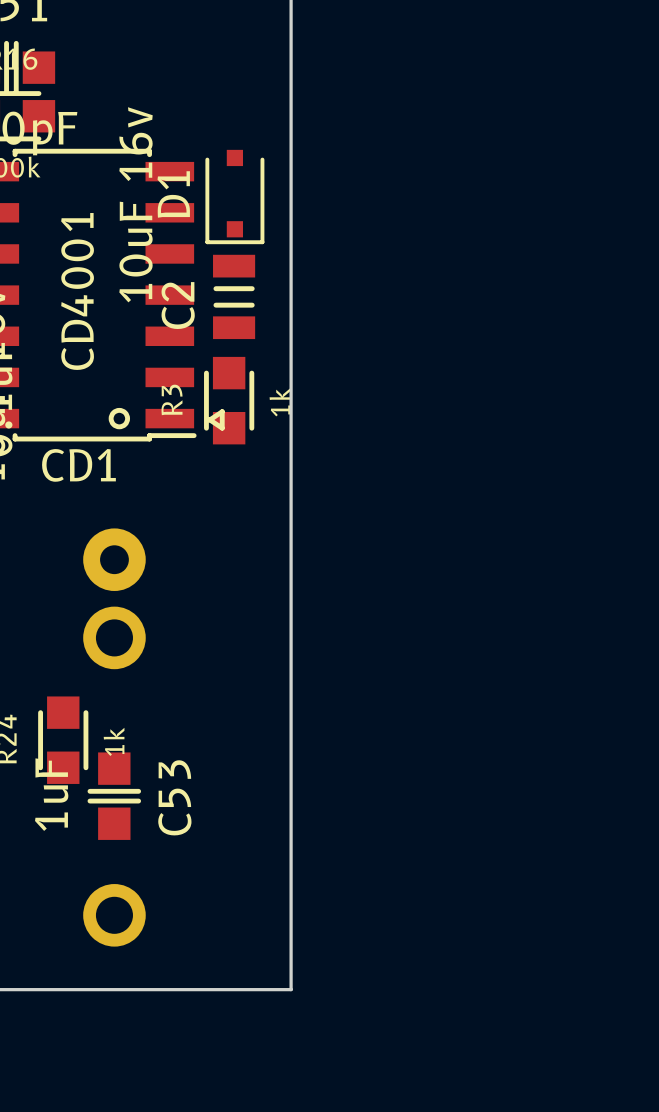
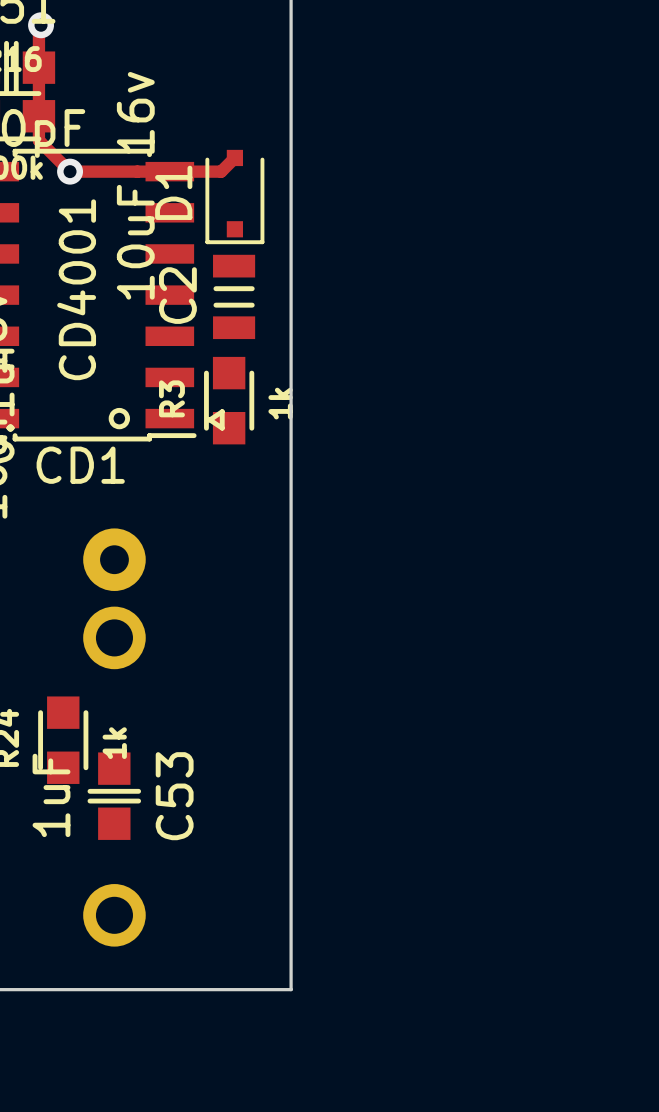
track: none -> (41, 25) (38, 27) (38, 140) (70, 171) (221, 171) (234, 157)
via: none -> (41, 25)
via: none -> (70, 171)

